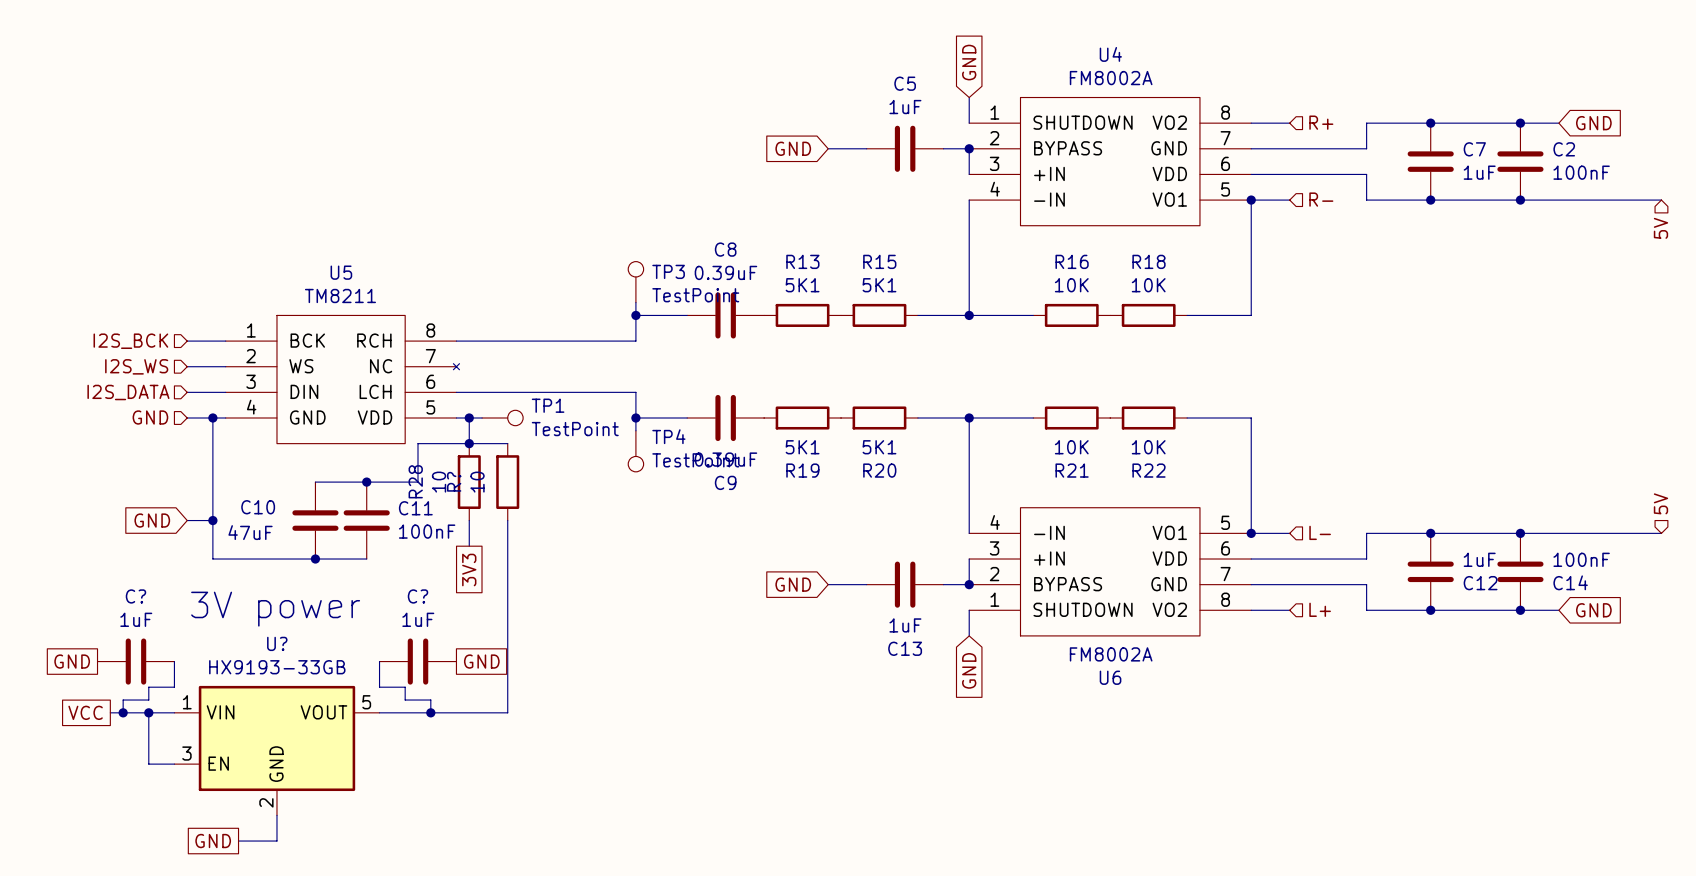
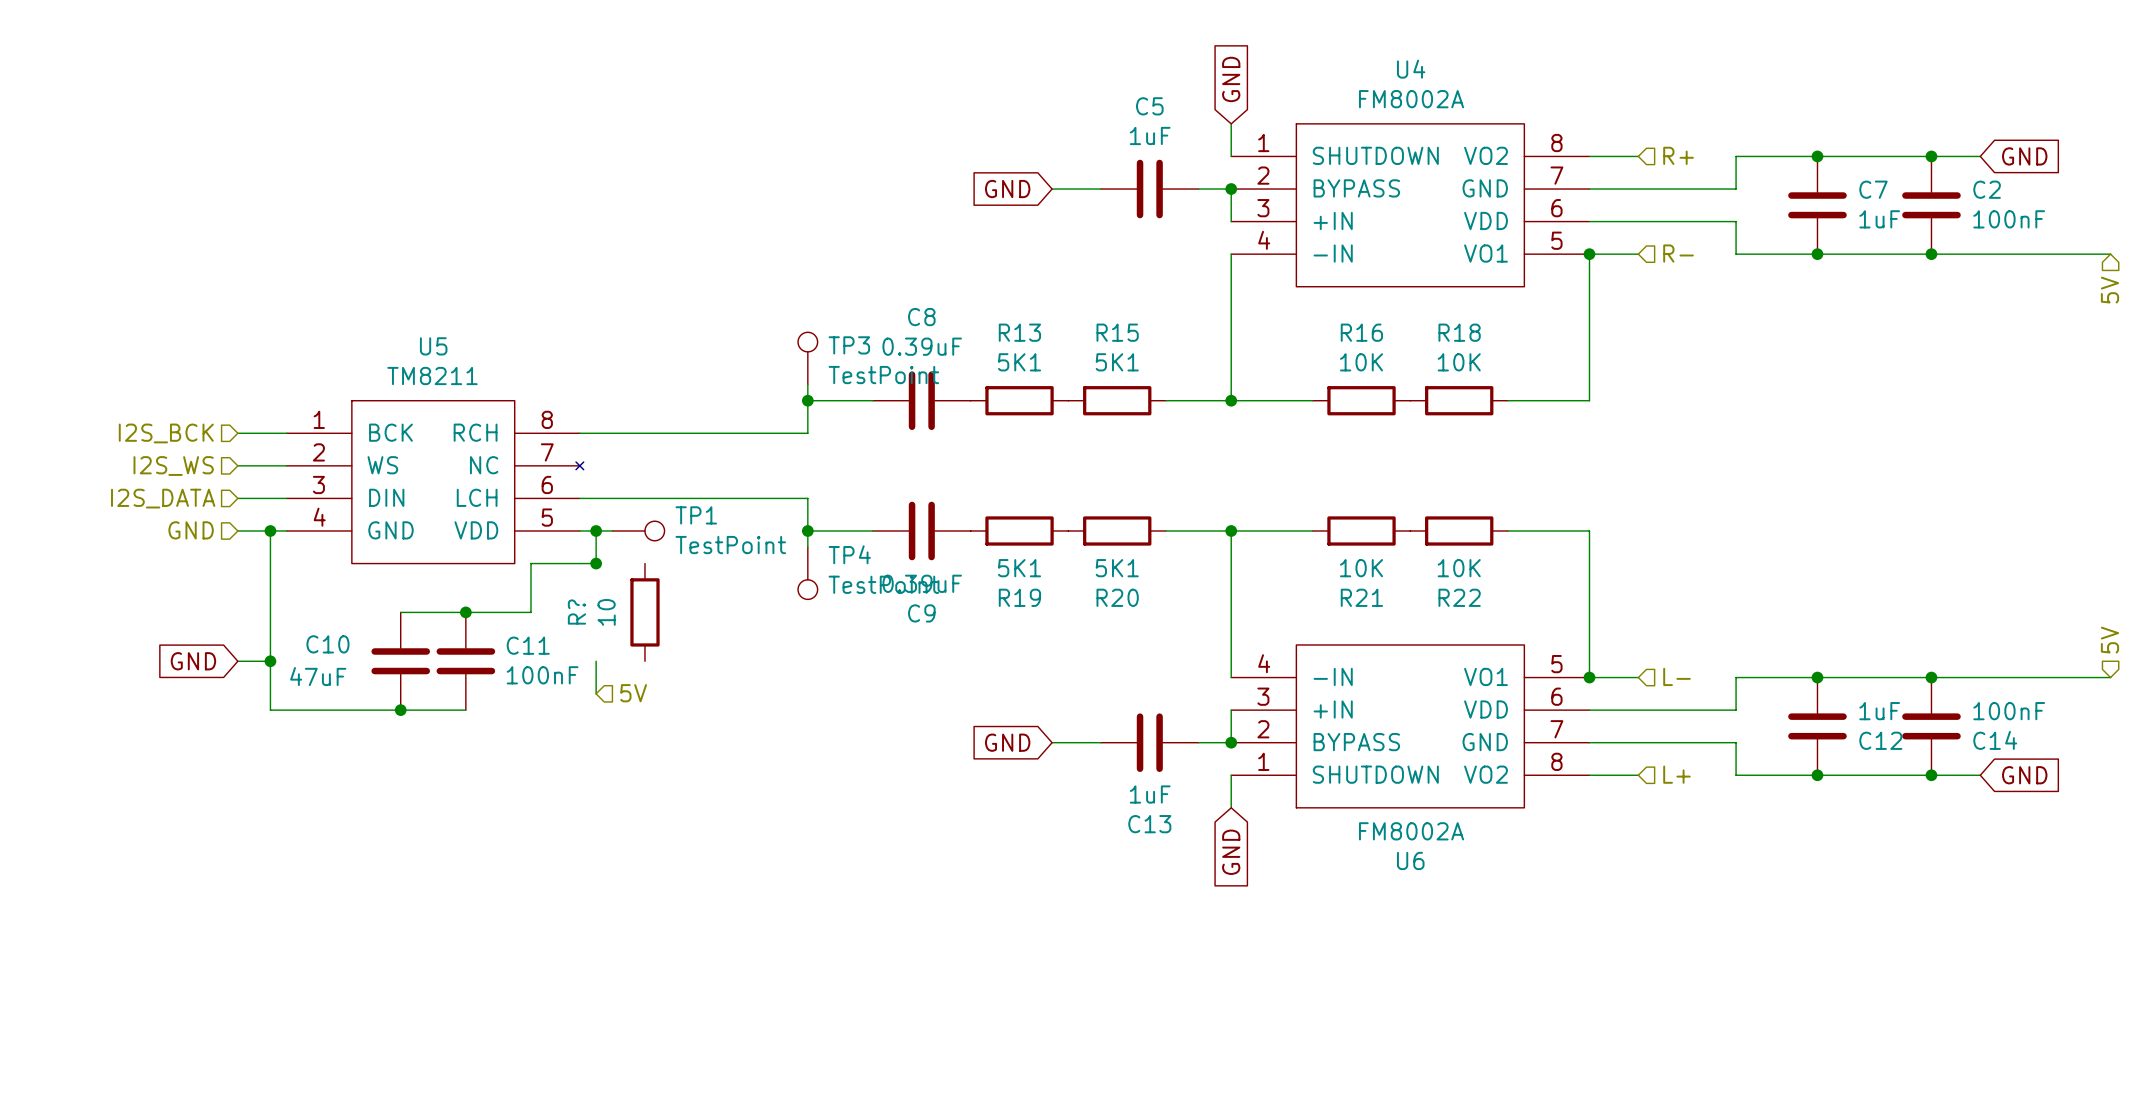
wire: (469, 443) (507, 443) -> none
R28: 10 (469, 482) -> none
wire: (507, 520) (507, 712) (379, 712) -> none
hierarchical label: none -> 5V (633, 693)
global label: 3V3 (469, 570) -> none
text: 3V power (275, 609) -> none
global label: GND (72, 661) -> none
C?: 1uF (135, 661) -> none
wire: (174, 661) (174, 687) (148, 687) (148, 700) (123, 700) (123, 712) -> none
wire: (379, 661) (379, 687) (405, 687) (405, 700) (430, 700) (430, 712) -> none
C?: 1uF (417, 661) -> none
global label: GND (481, 661) -> none
global label: VCC (85, 712) -> none
wire: (110, 712) (174, 712) -> none
junction: (123, 712) -> none
wire: (148, 712) (148, 764) (174, 764) -> none
junction: (148, 712) -> none
junction: (430, 712) -> none
U?: HX9193-33GB (276, 750) -> none
wire: (276, 815) (276, 841) (238, 841) -> none
global label: GND (213, 841) -> none

